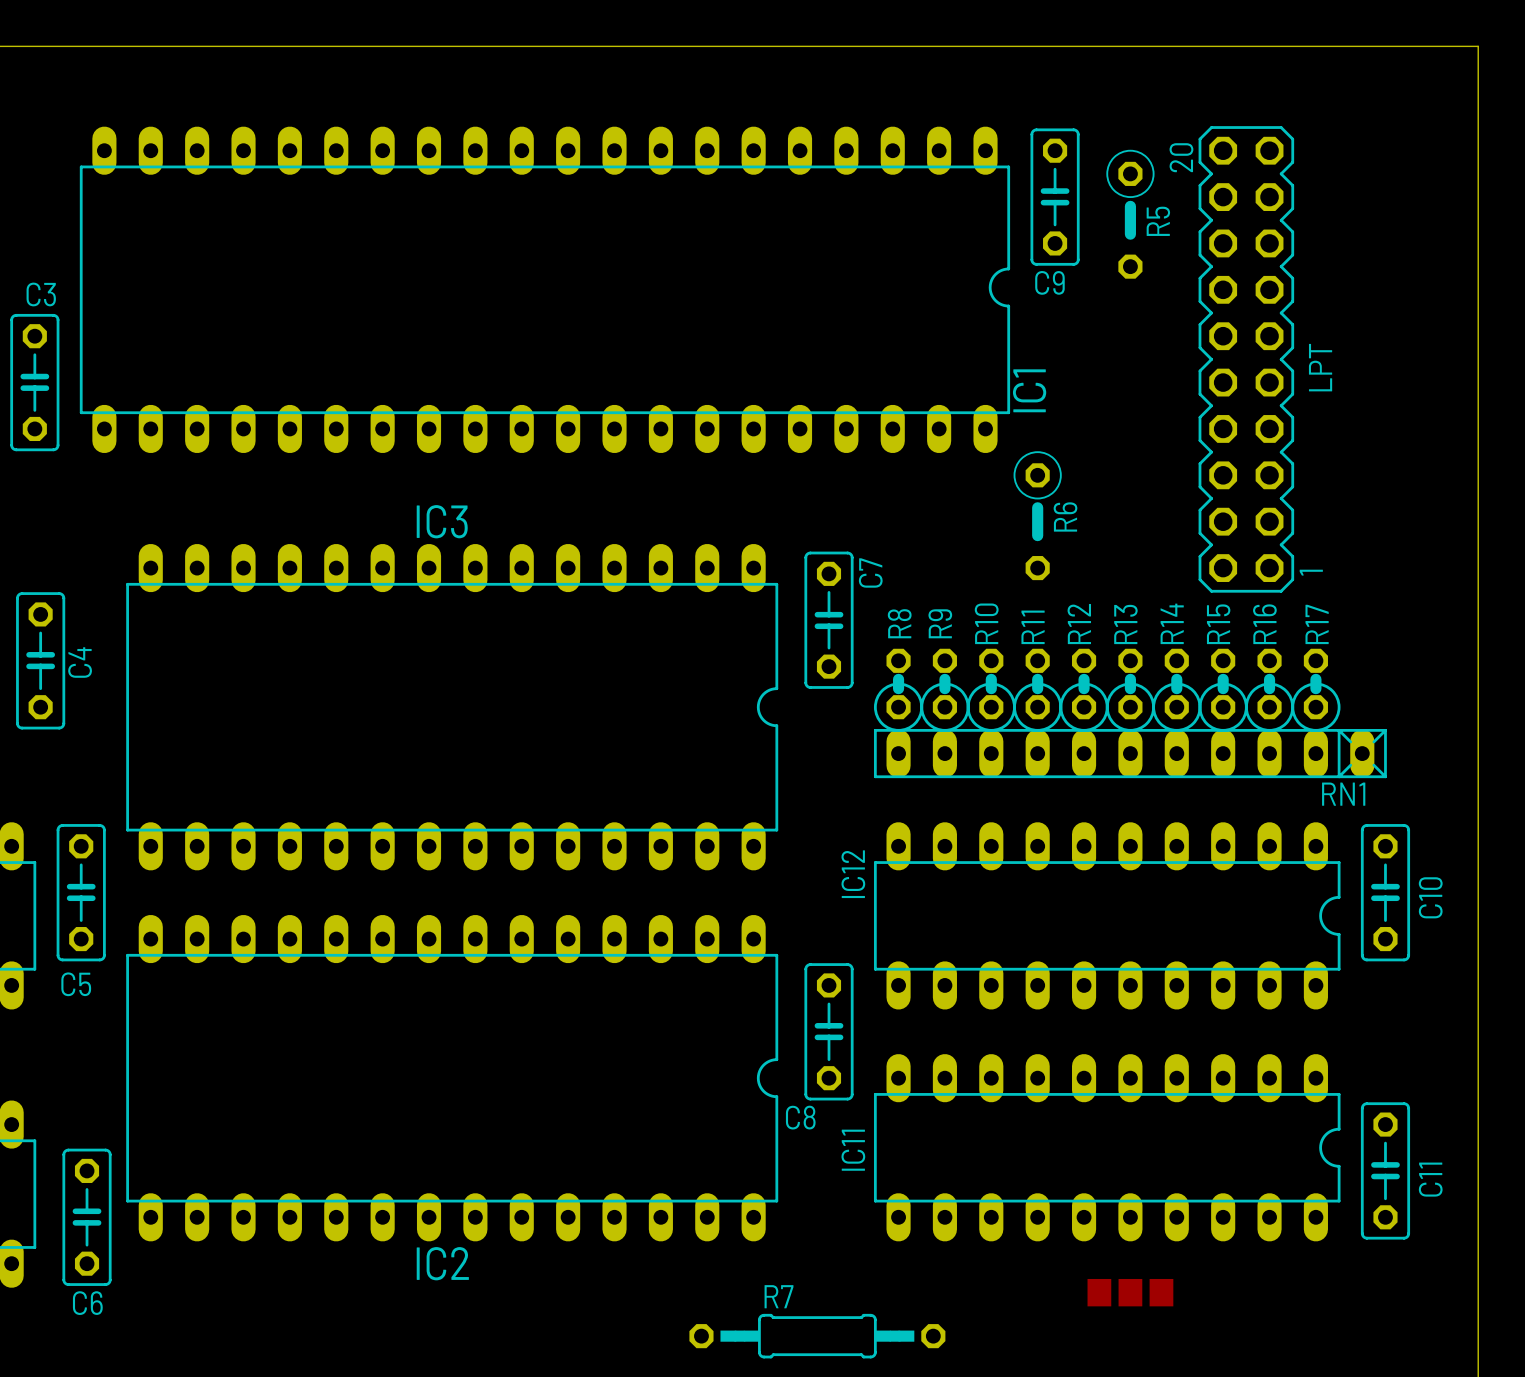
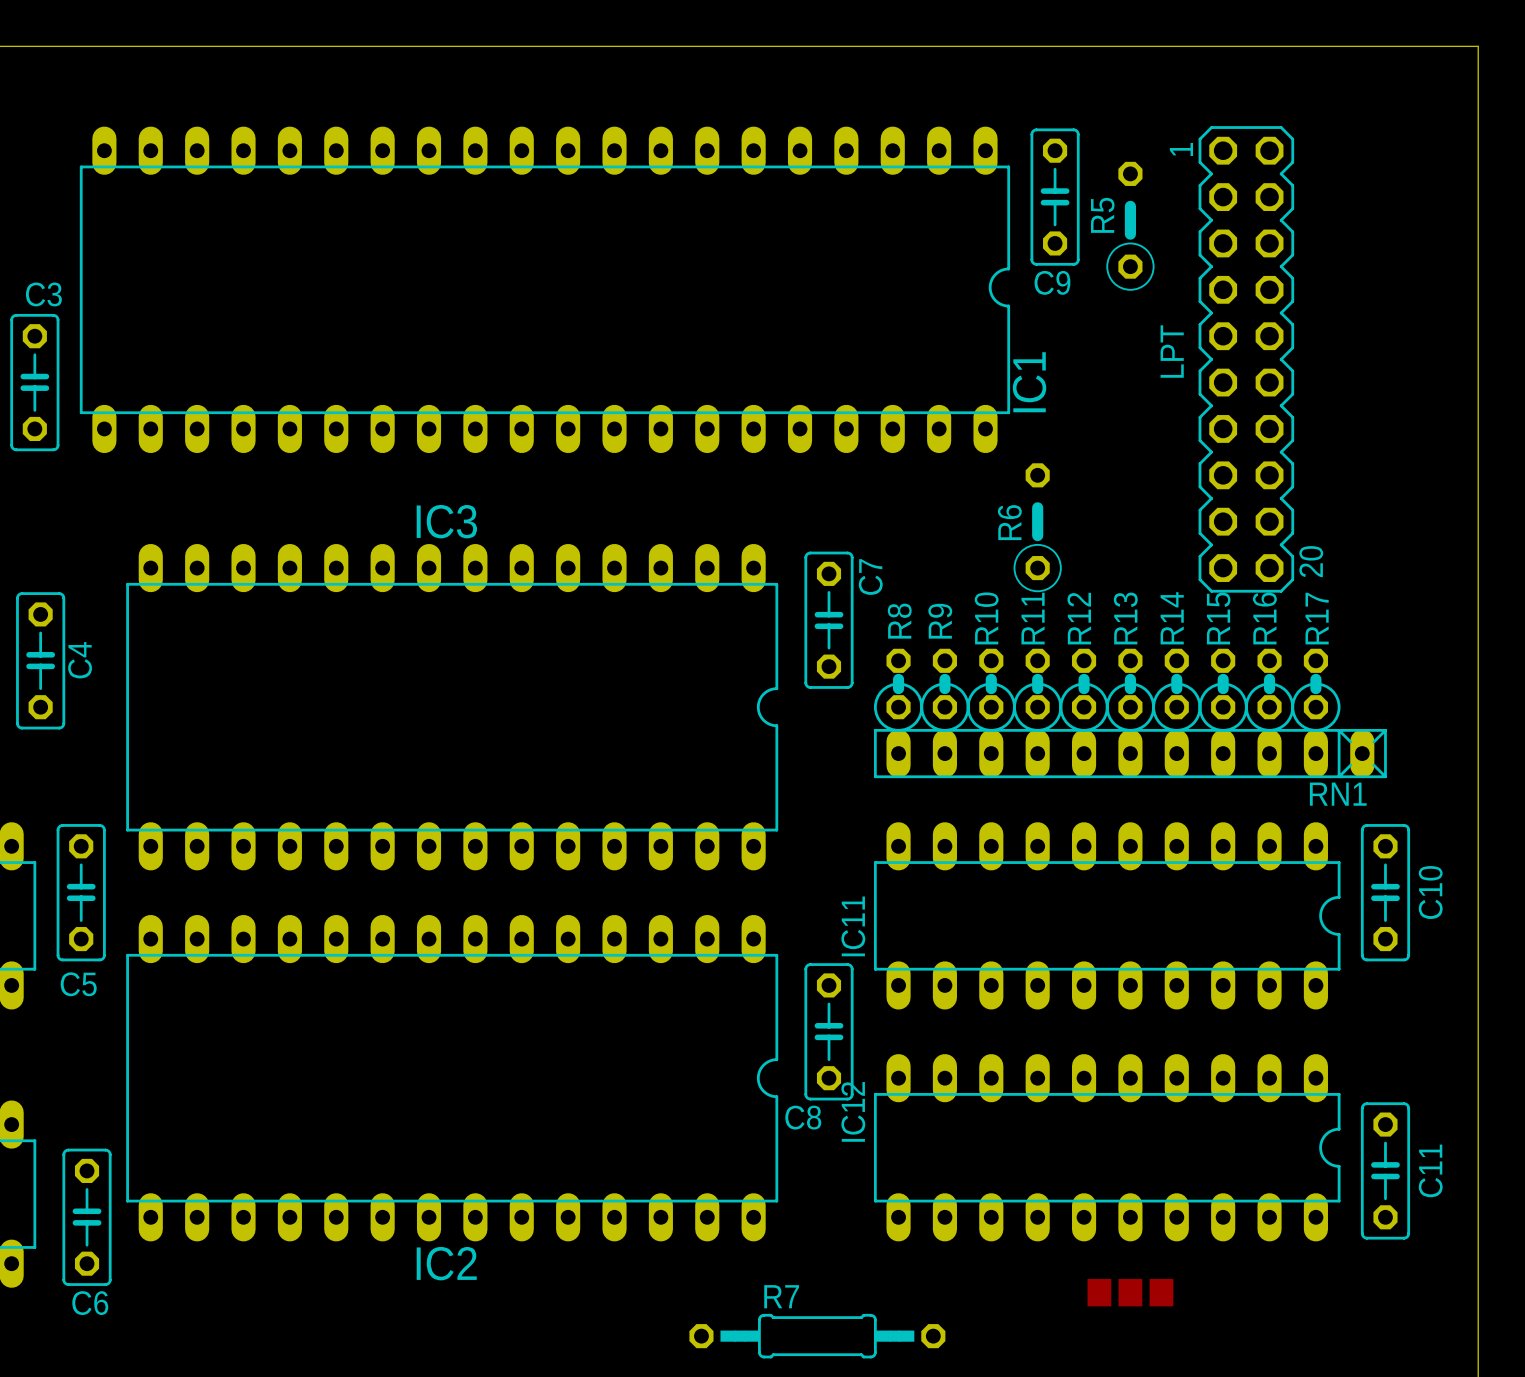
LPT text position: 20 (1181, 157) -> 20 (1311, 561)
R5 rotation: 0° (1130, 214) -> 180° (1130, 226)
LPT name position: LPT (1320, 367) -> LPT (1172, 351)
R6 rotation: 0° (1037, 515) -> 180° (1037, 527)
LPT text position: 1 (1311, 572) -> 1 (1181, 149)
IC12 name: IC12 (853, 874) -> IC11 (853, 926)
IC11 name: IC11 (853, 1150) -> IC12 (853, 1111)

